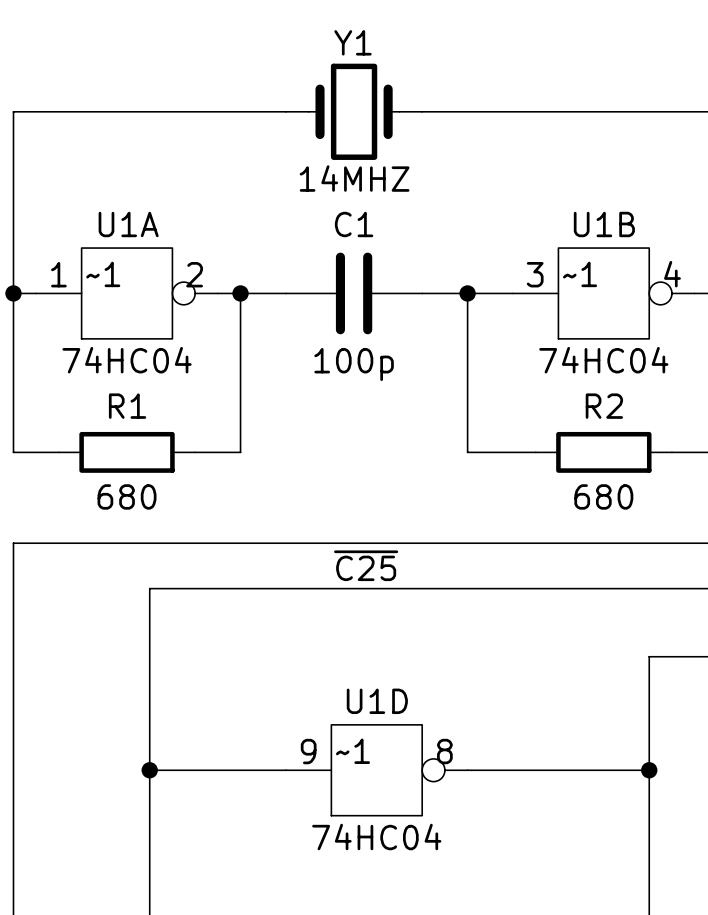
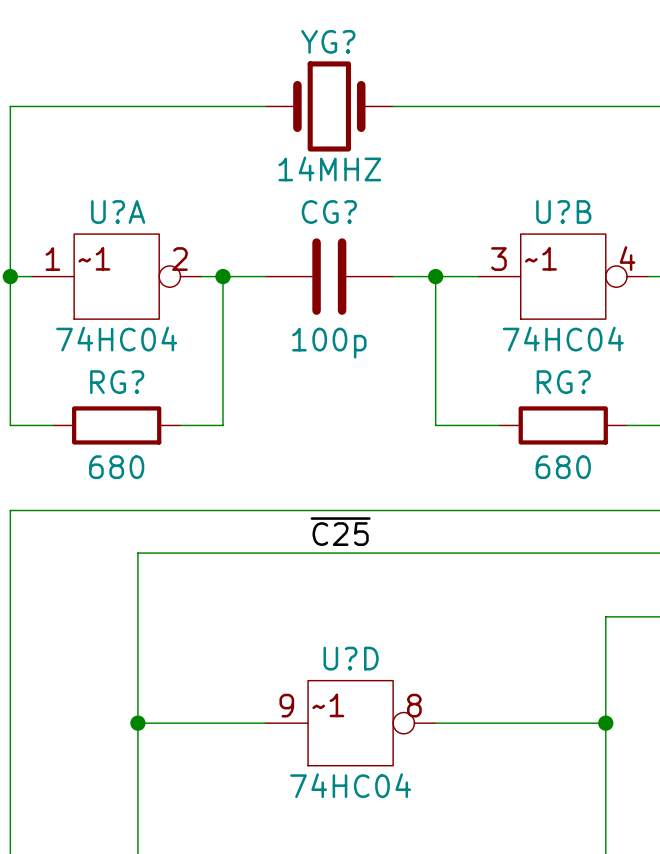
Y1 name: Y1 (352, 42) -> YG? (328, 41)
U1A name: U1A (128, 224) -> U?A (118, 212)
C1 name: C1 (354, 224) -> CG? (329, 212)
U1B name: U1B (604, 224) -> U?B (563, 212)
R1 name: R1 (127, 406) -> RG? (117, 382)
R2 name: R2 (604, 406) -> RG? (563, 382)
U1D name: U1D (377, 701) -> U?D (351, 658)

